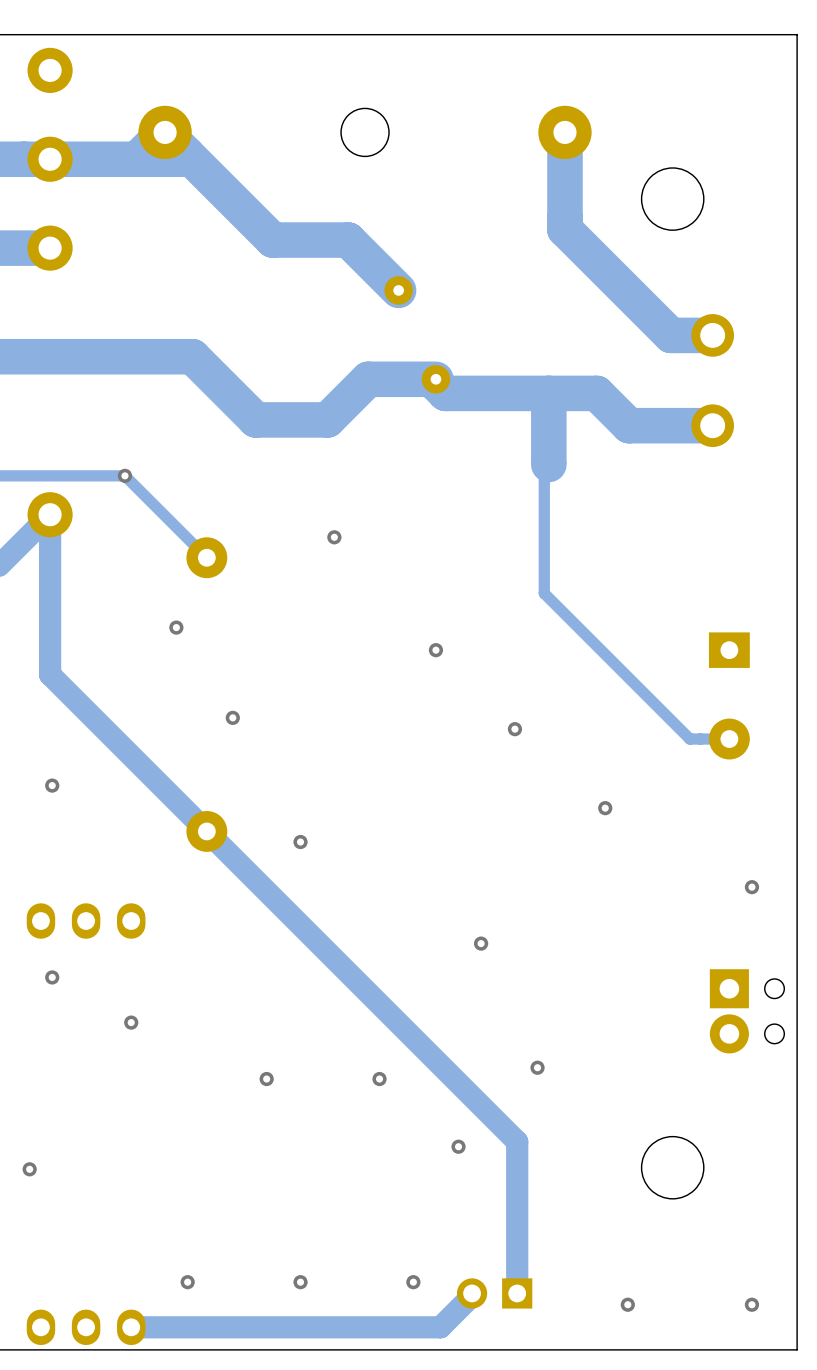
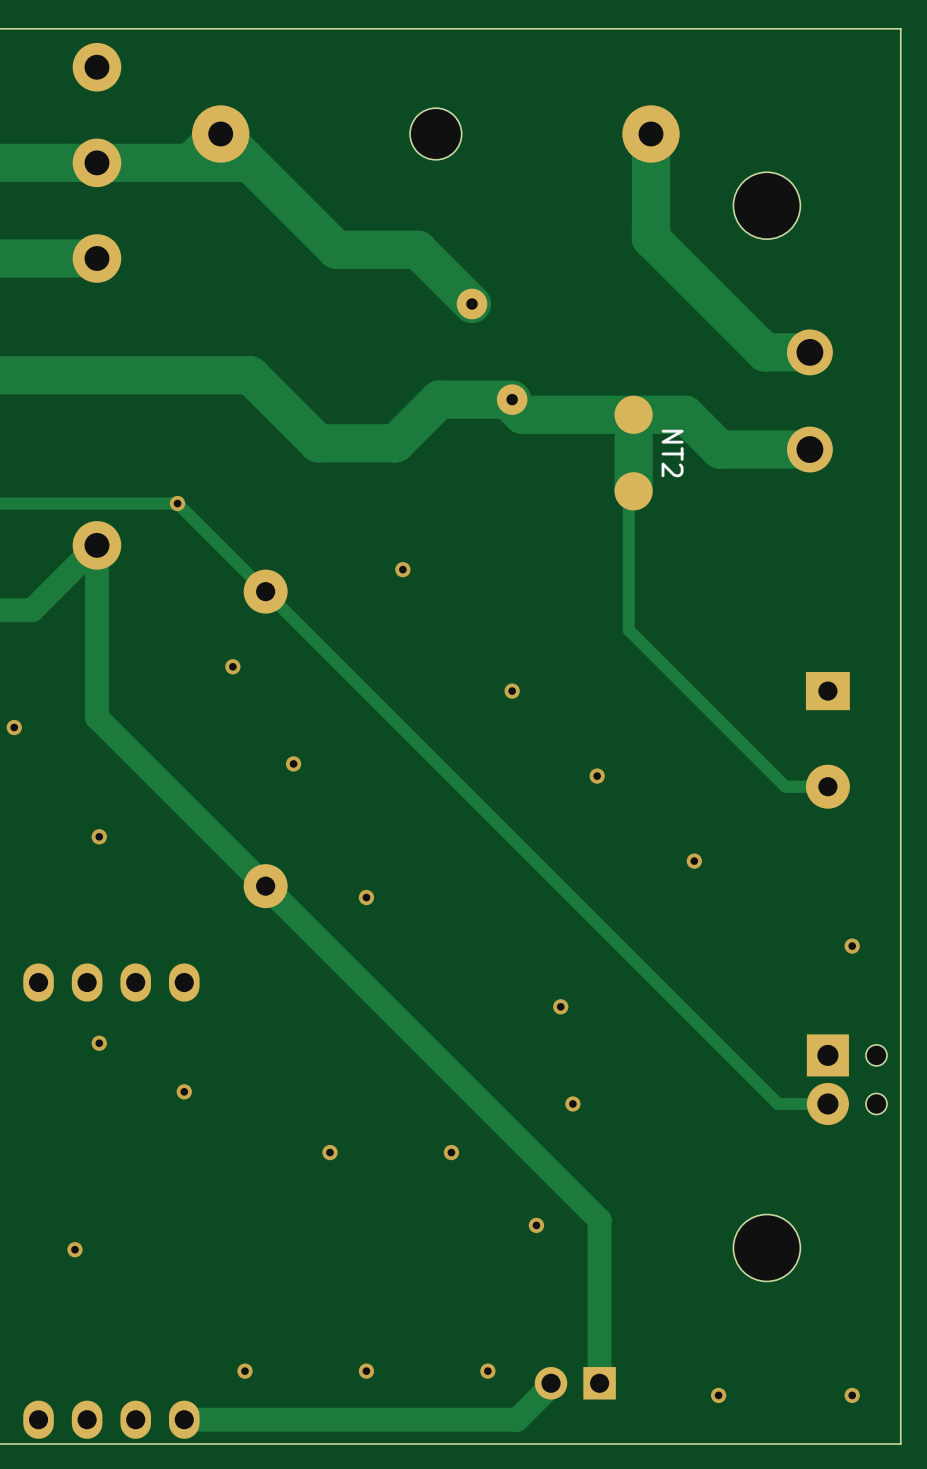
NT2 name: none -> NT2 (672, 453)
track: none -> (265, 591) (777, 1103) (827, 1103)
via position: (537, 1067) -> (572, 1103)

